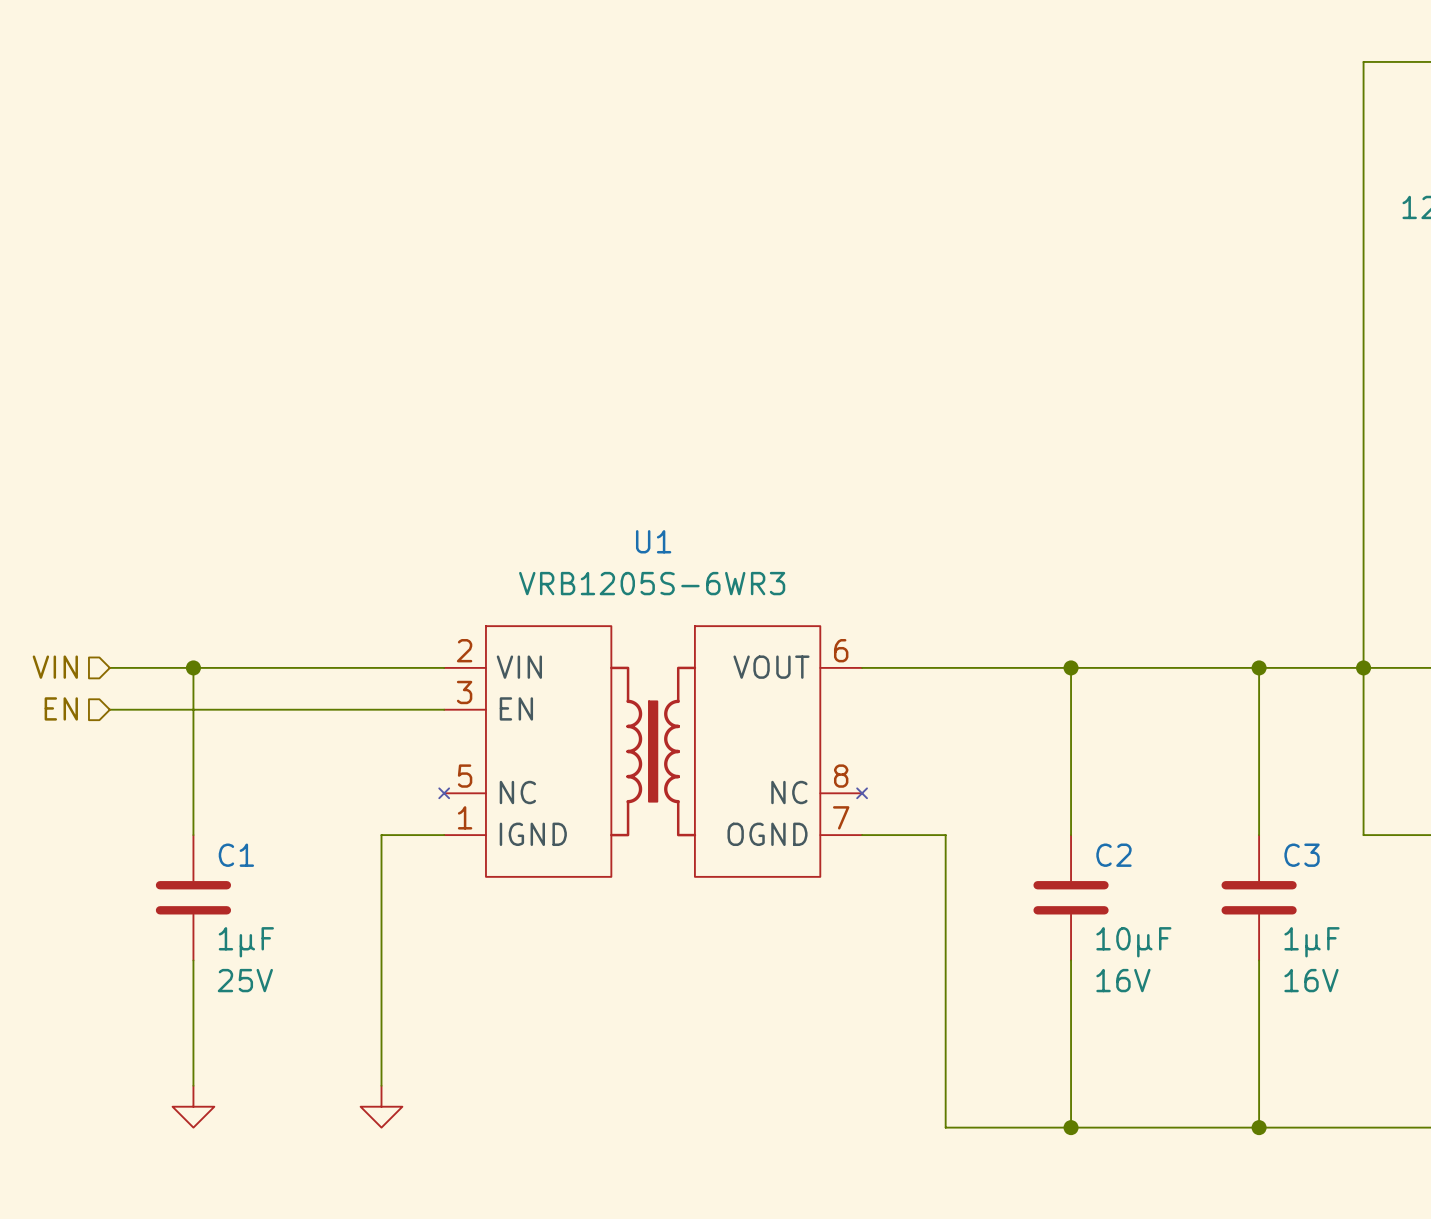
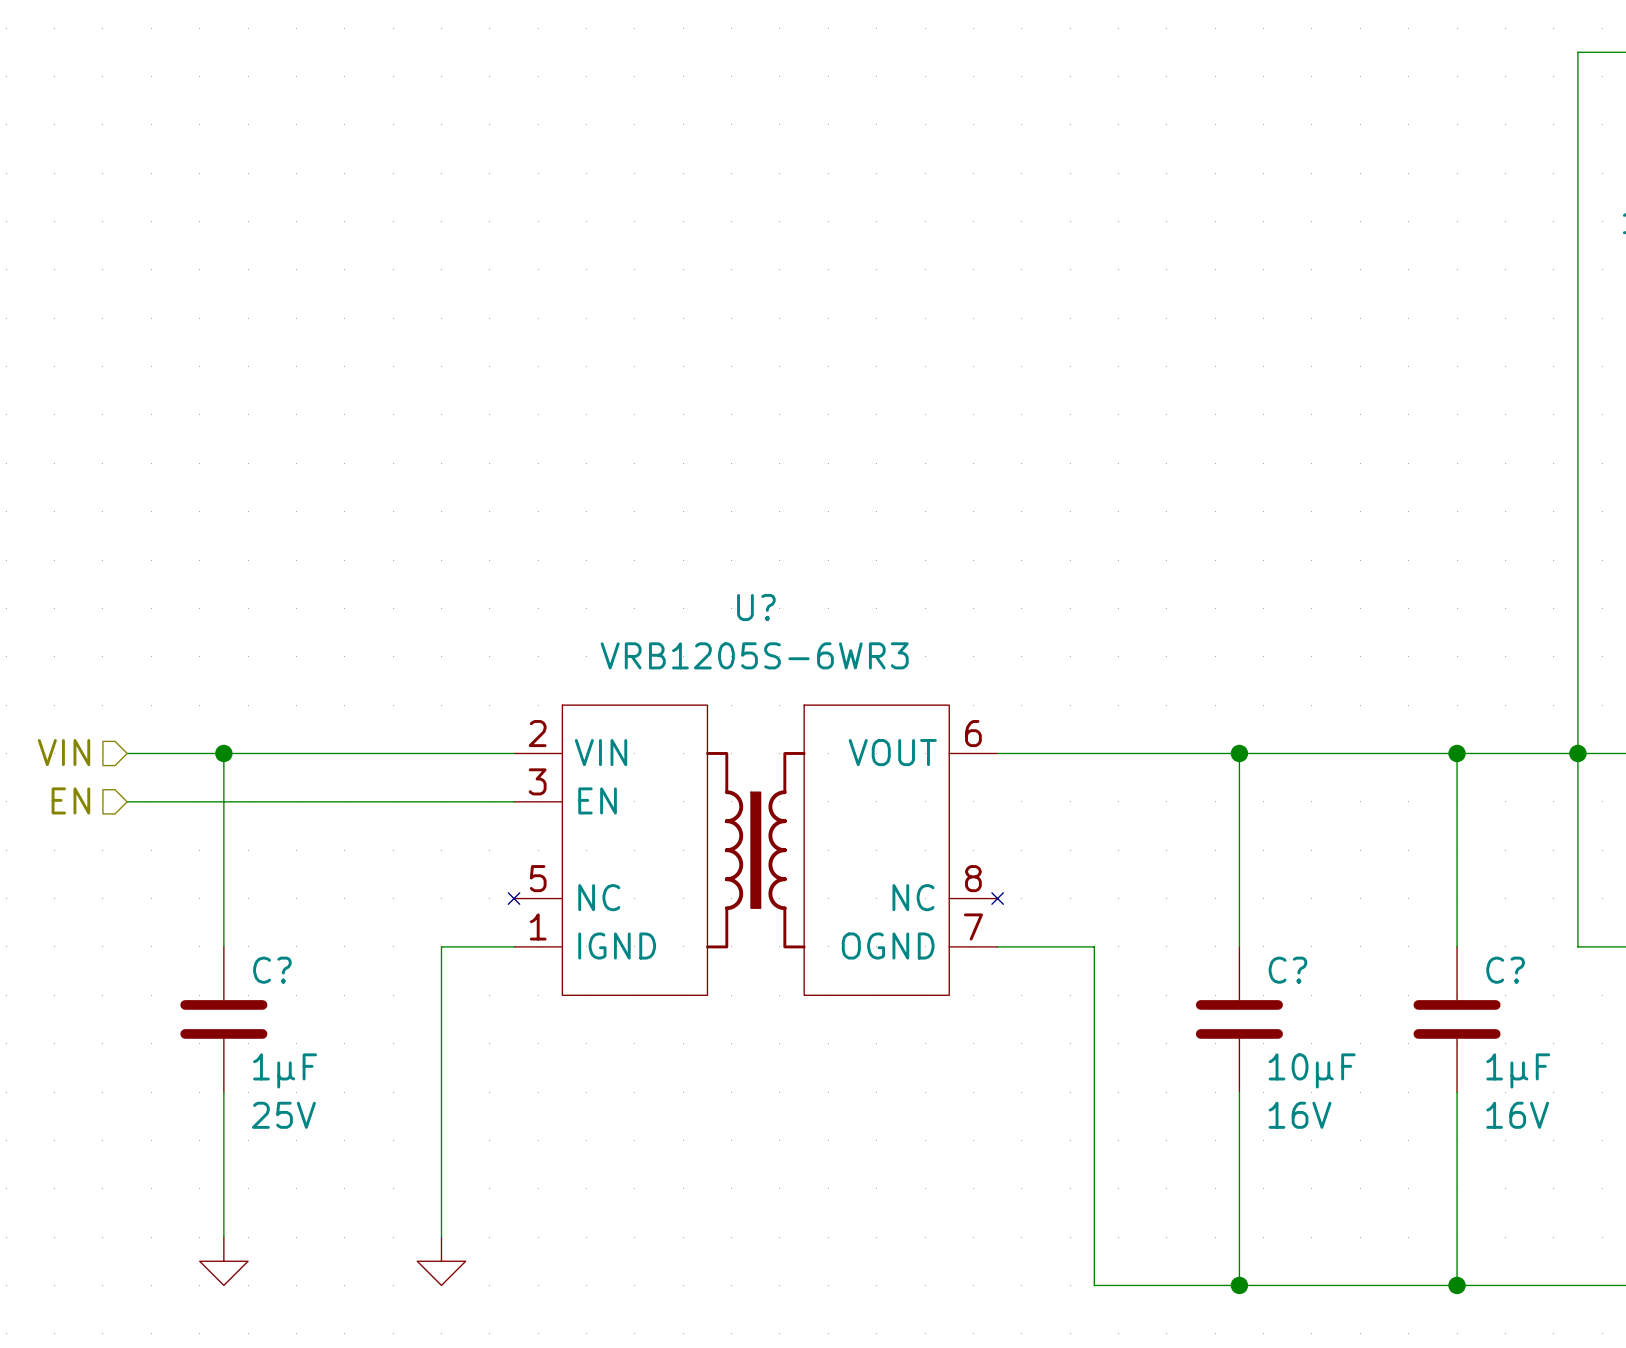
U1 name: U1 (653, 541) -> U? (756, 607)
C1 name: C1 (236, 855) -> C? (272, 970)
C2 name: C2 (1113, 855) -> C? (1287, 970)
C3 name: C3 (1302, 855) -> C? (1505, 970)

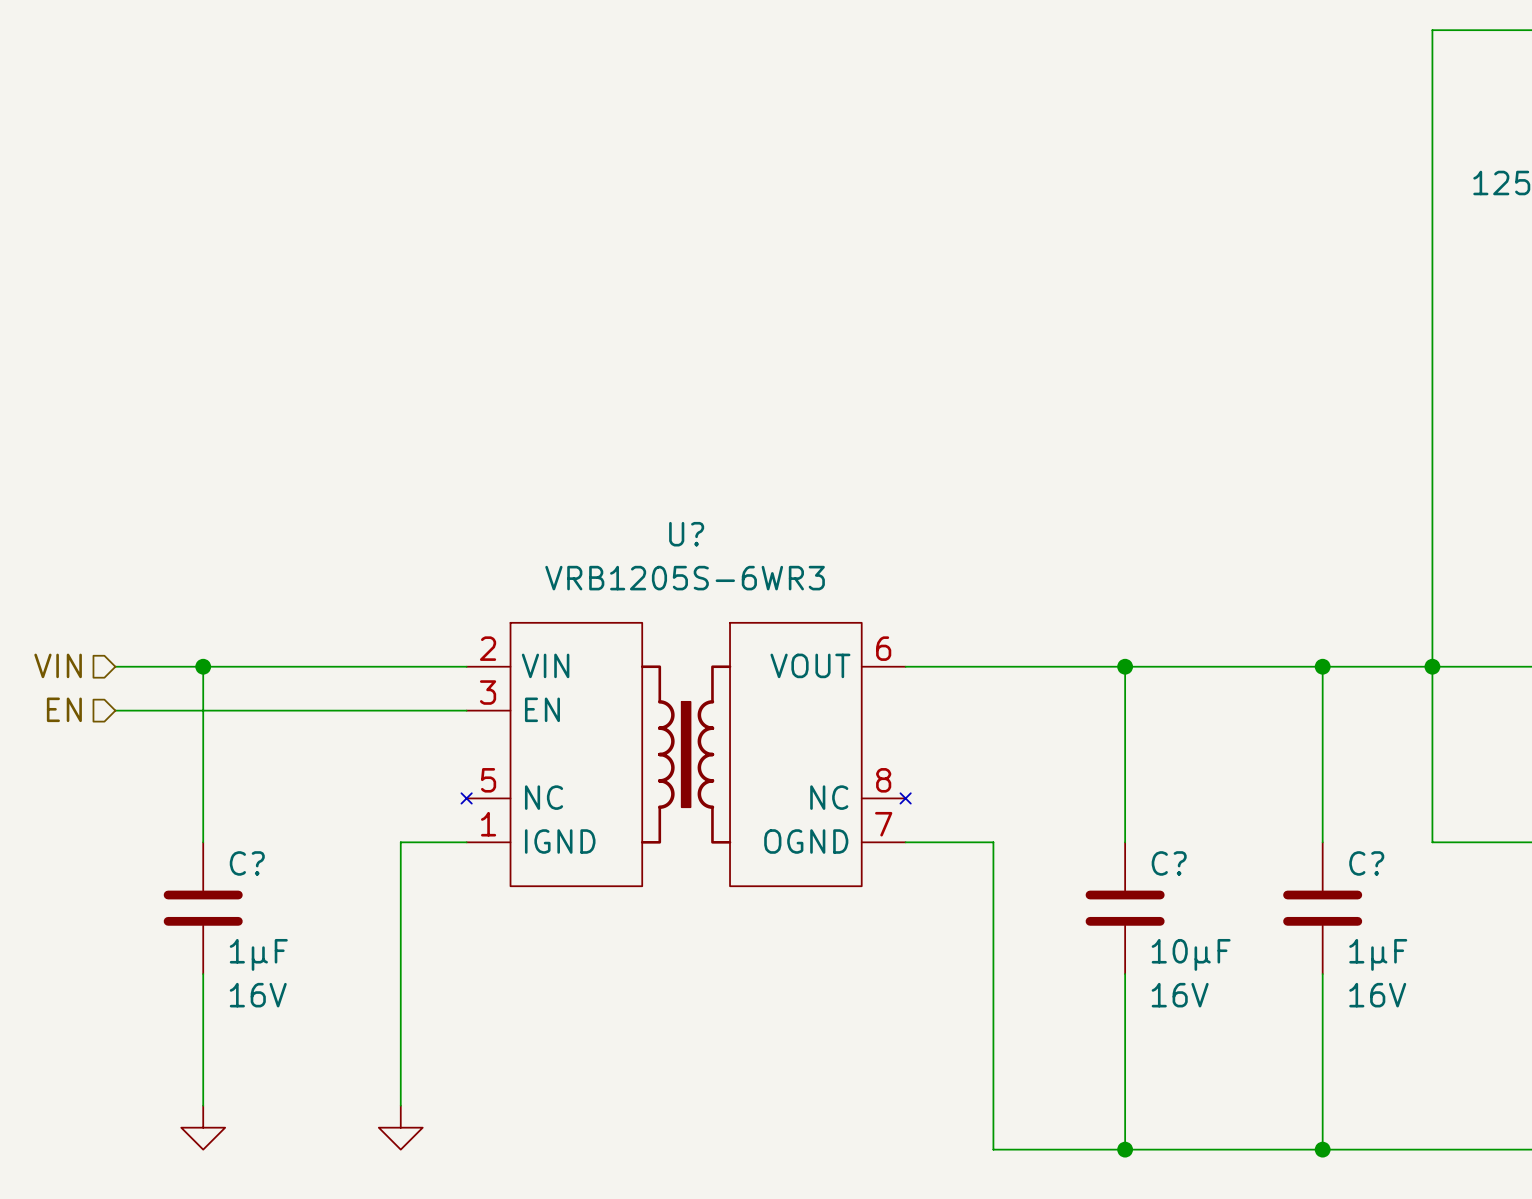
C? text: 25V (283, 1115) -> 16V (258, 995)

